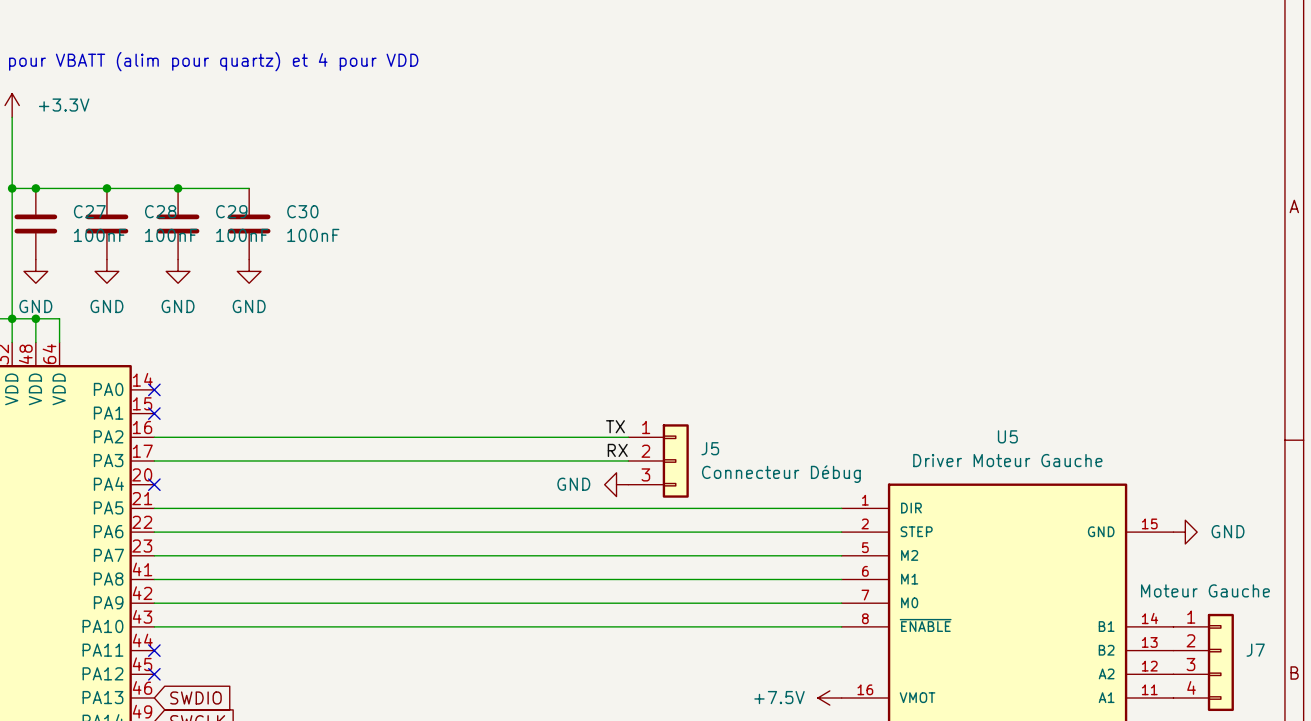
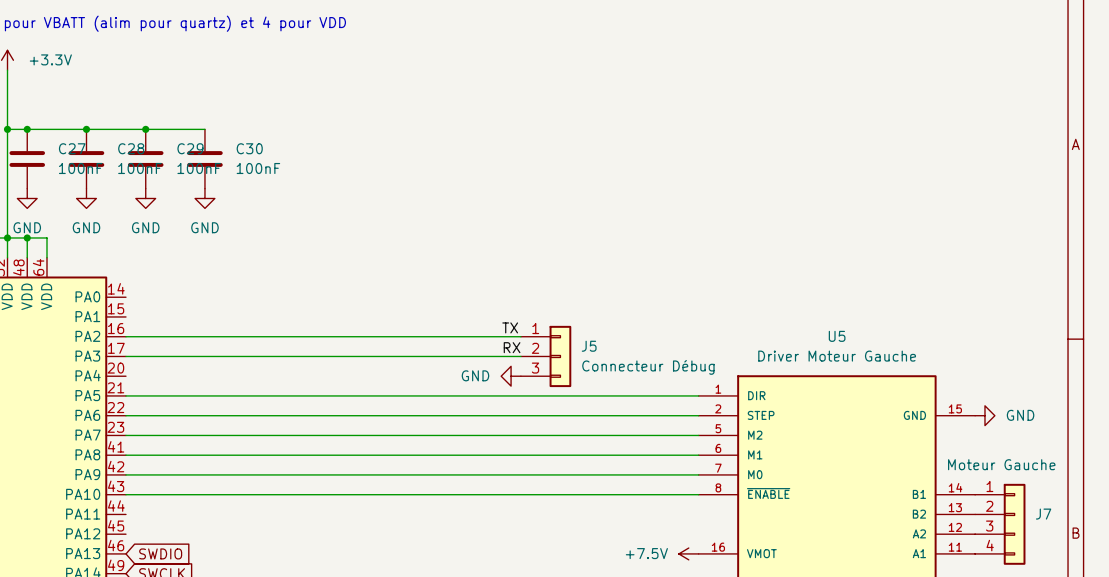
no-connect mark: (154, 389) -> none
no-connect mark: (154, 413) -> none
no-connect mark: (154, 484) -> none
no-connect mark: (154, 650) -> none
no-connect mark: (154, 674) -> none

